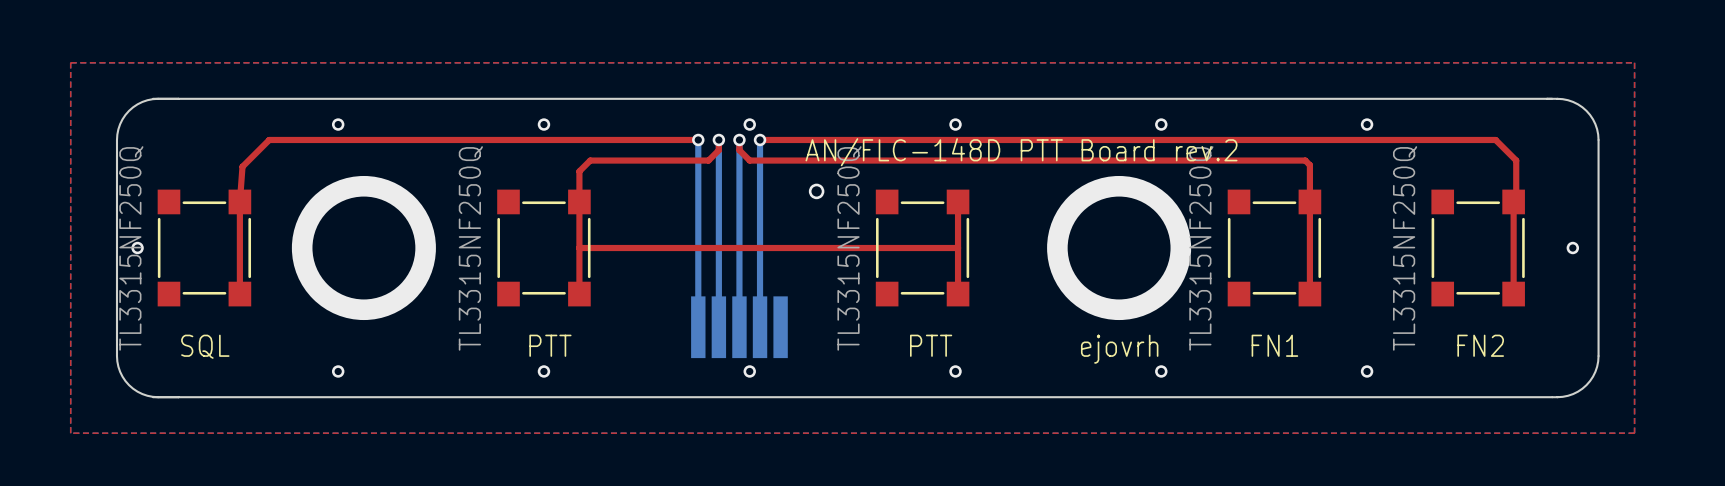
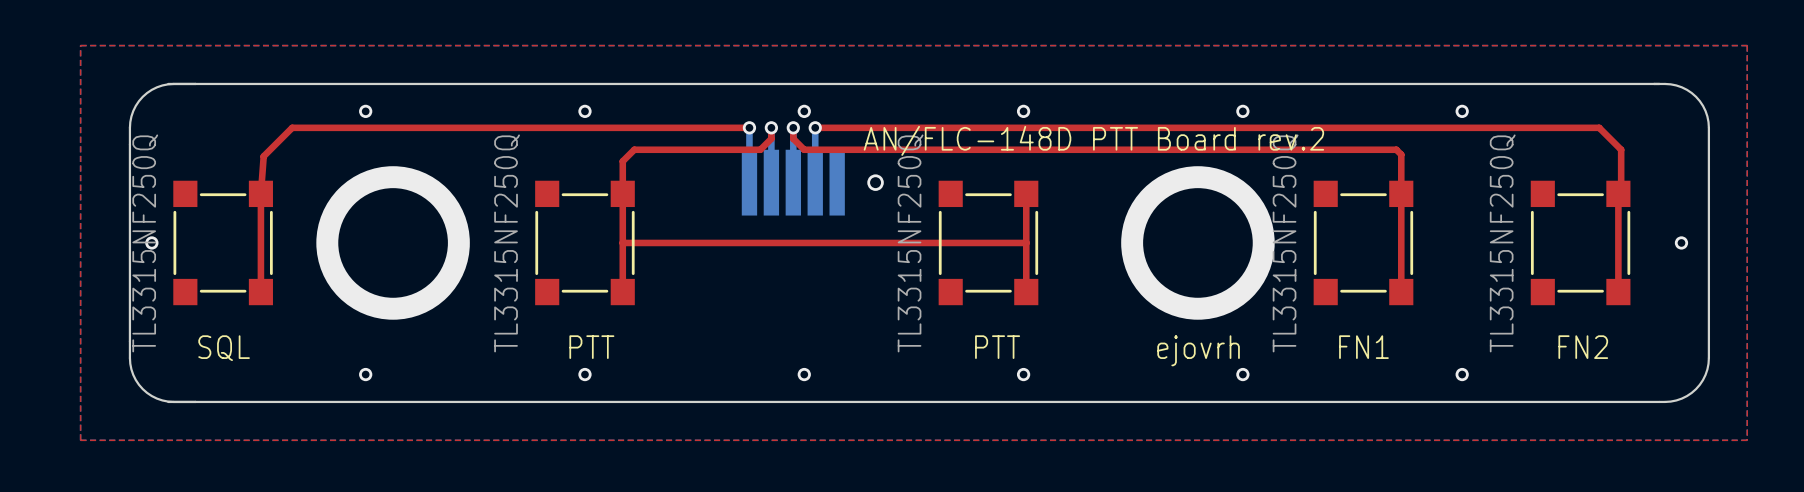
bottom track: (698, 191) (698, 327) -> none
bottom track: (718, 191) (718, 327) -> none
bottom track: (739, 191) (739, 327) -> none
bottom track: (760, 191) (760, 327) -> none
part position: (739, 327) -> (793, 182)

